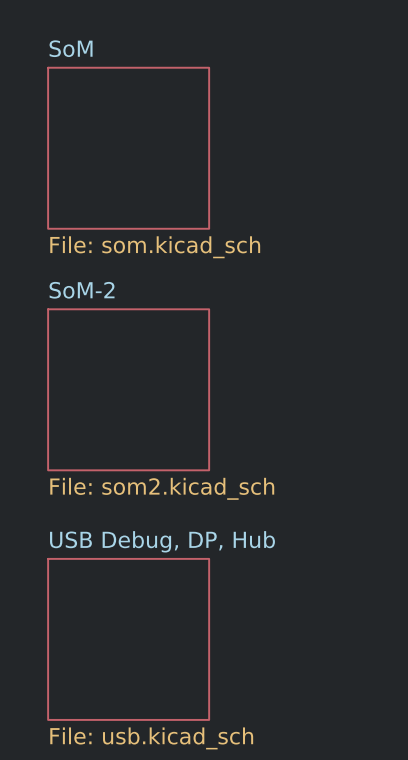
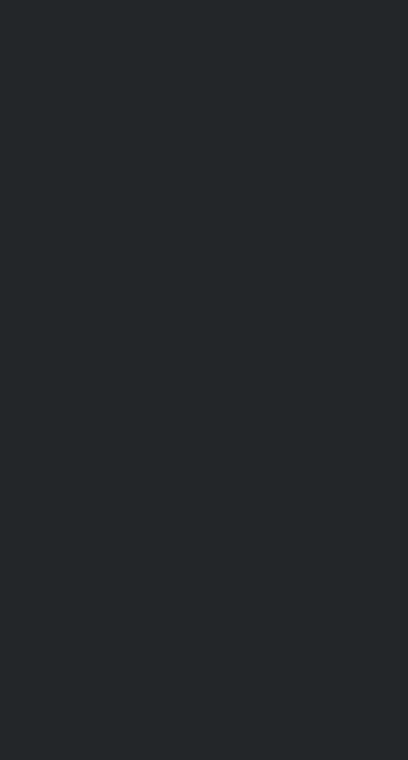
sheet SoM: File: som.kicad_sch (128, 148) -> none
sheet SoM-2: File: som2.kicad_sch (128, 389) -> none
sheet USB Debug, DP, Hub: File: usb.kicad_sch (128, 639) -> none

